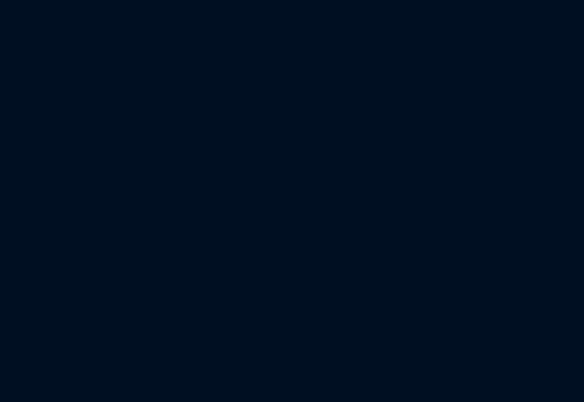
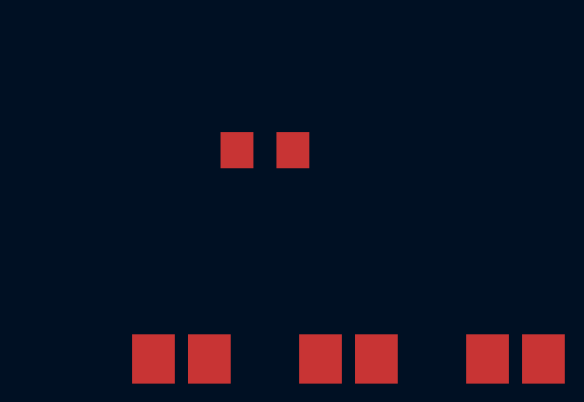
part: none -> (264, 150)
part: none -> (181, 358)
part: none -> (348, 358)
part: none -> (515, 358)

